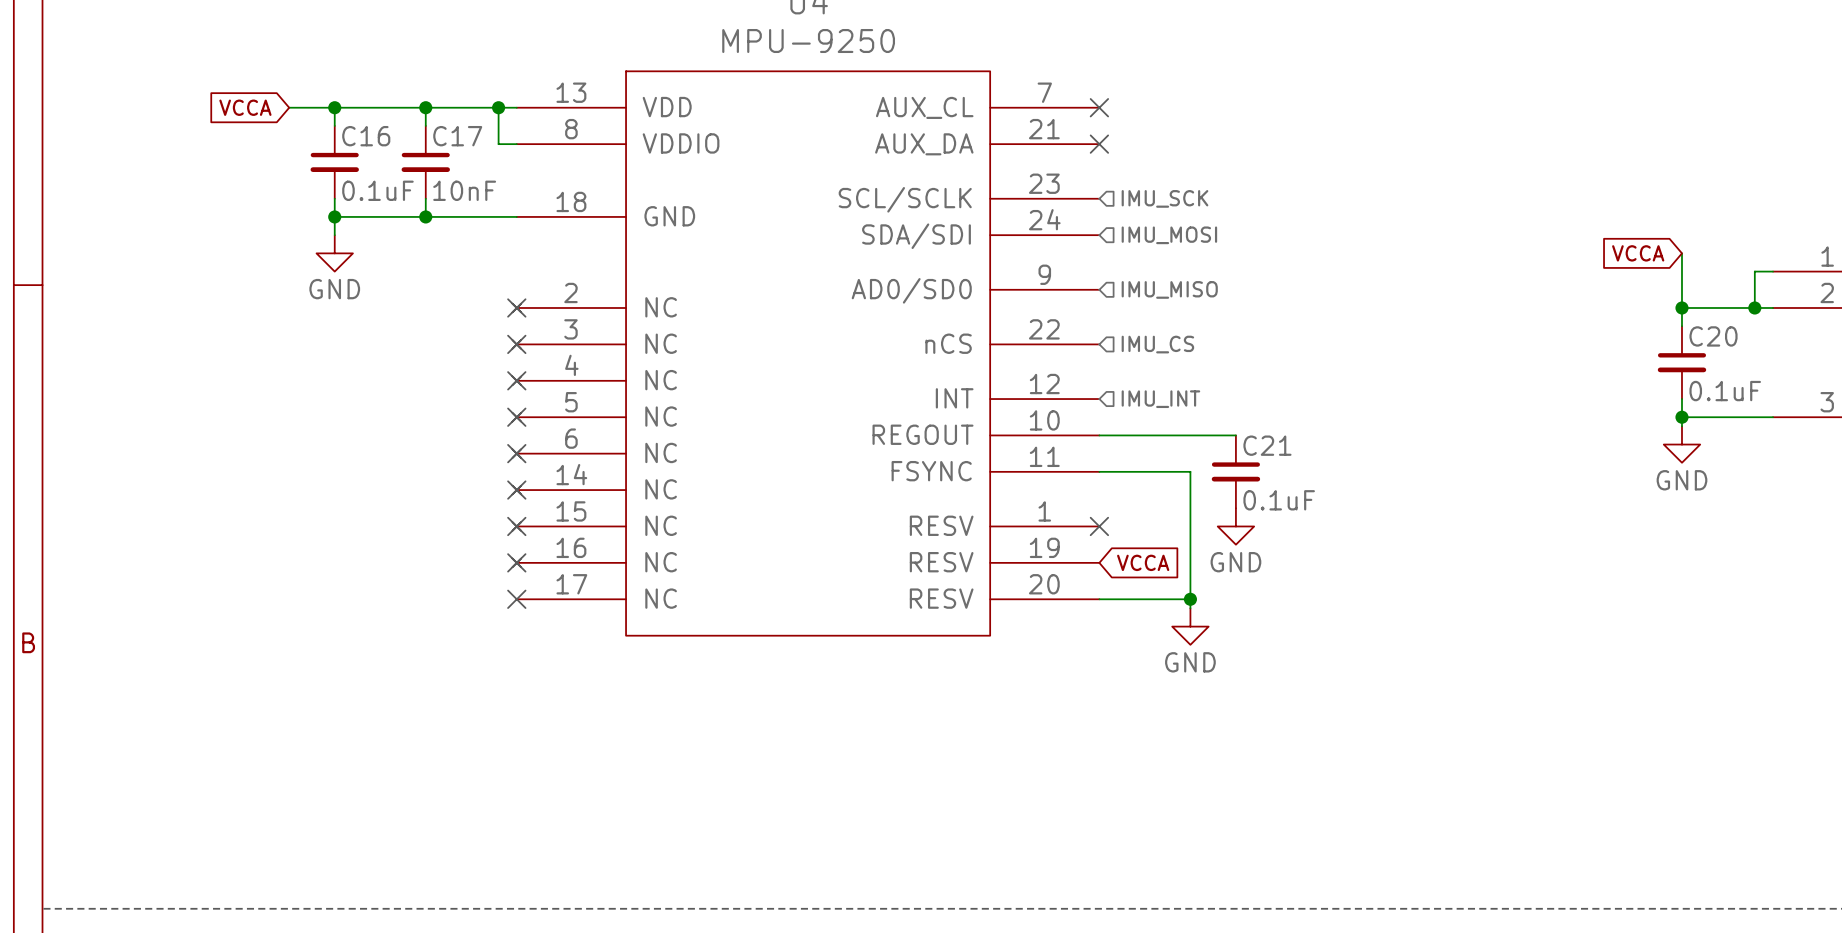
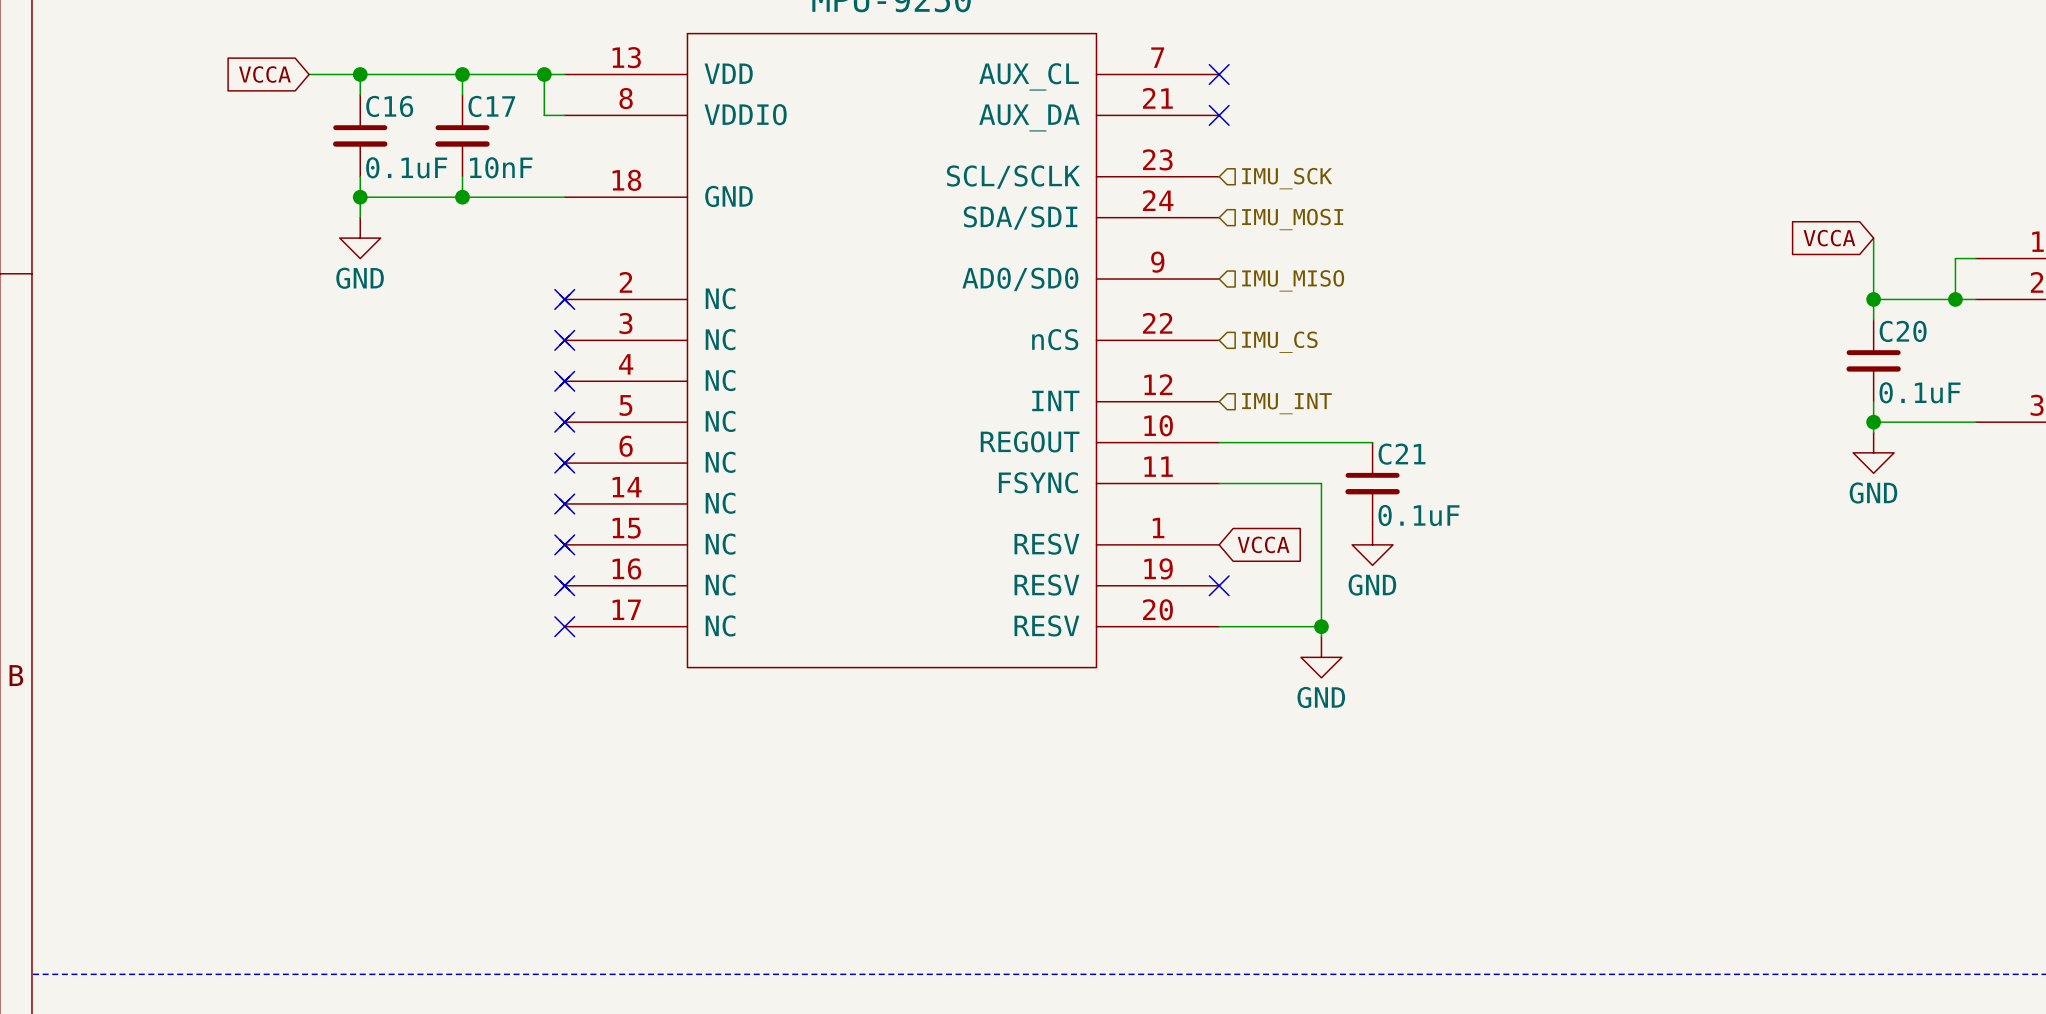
no-connect mark position: (1099, 526) -> (1219, 585)
global label position: VCCA (1143, 562) -> VCCA (1263, 544)

